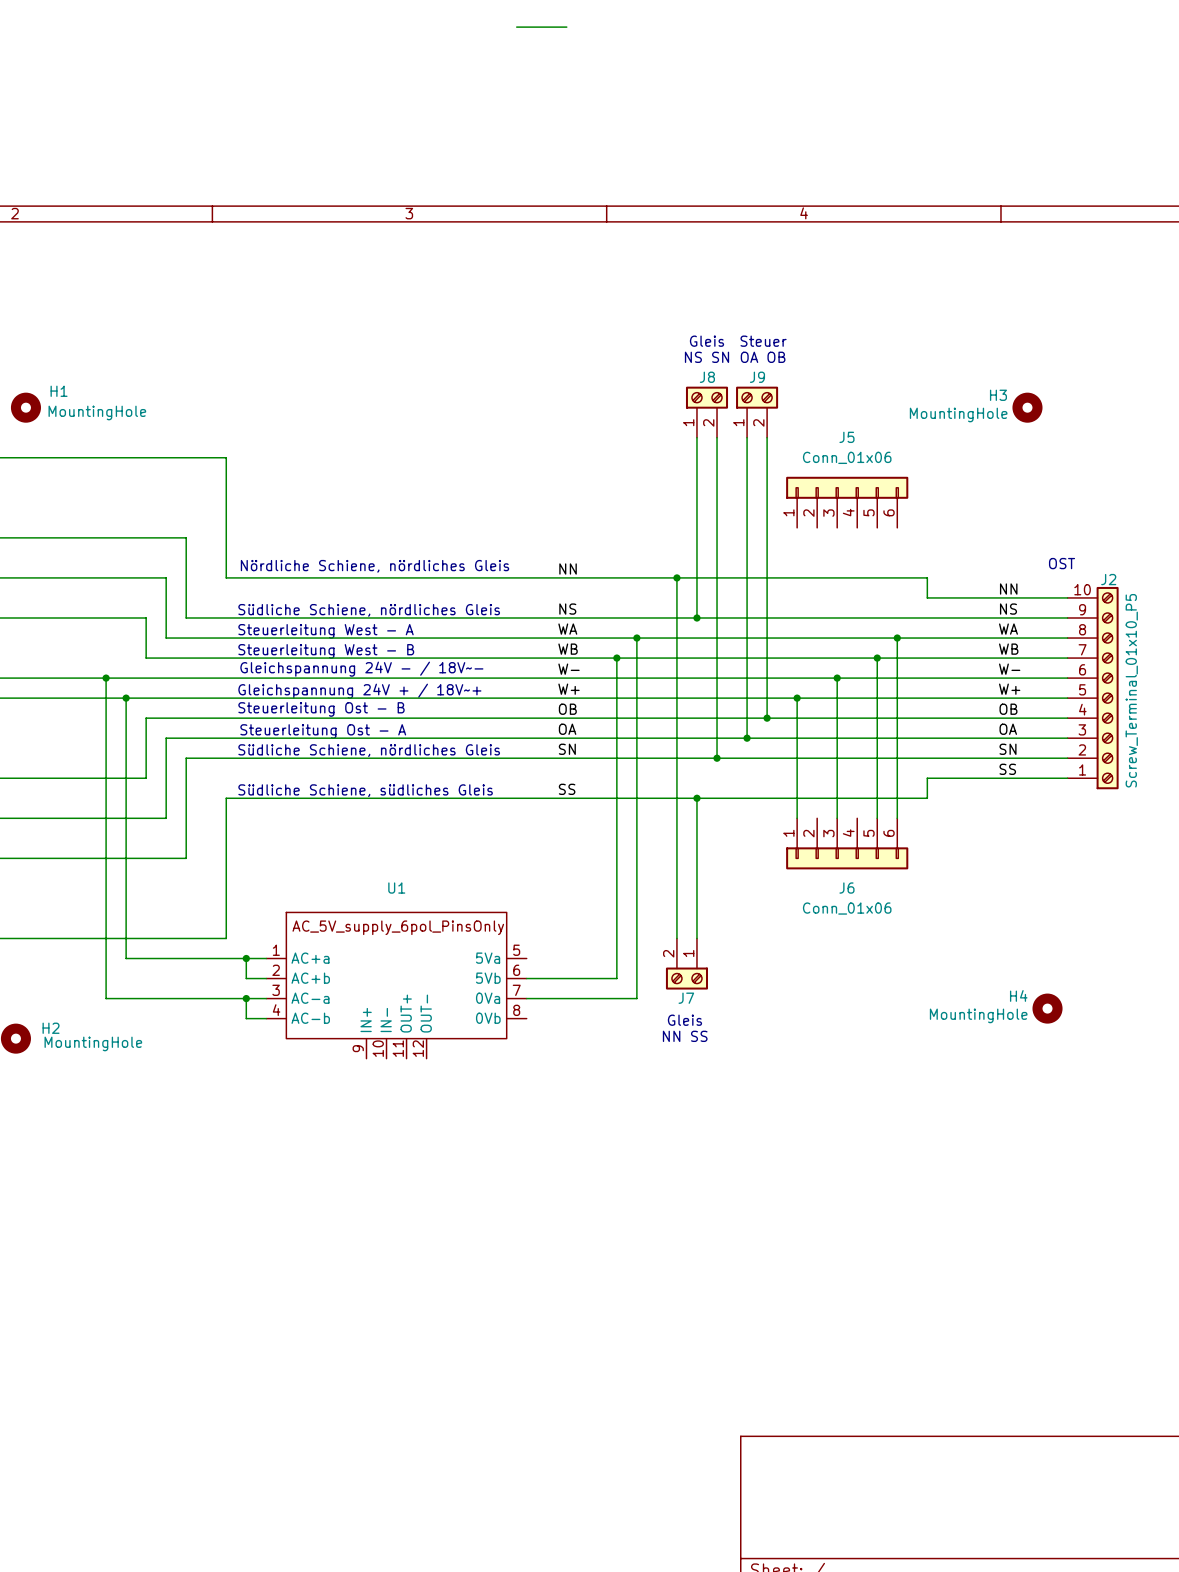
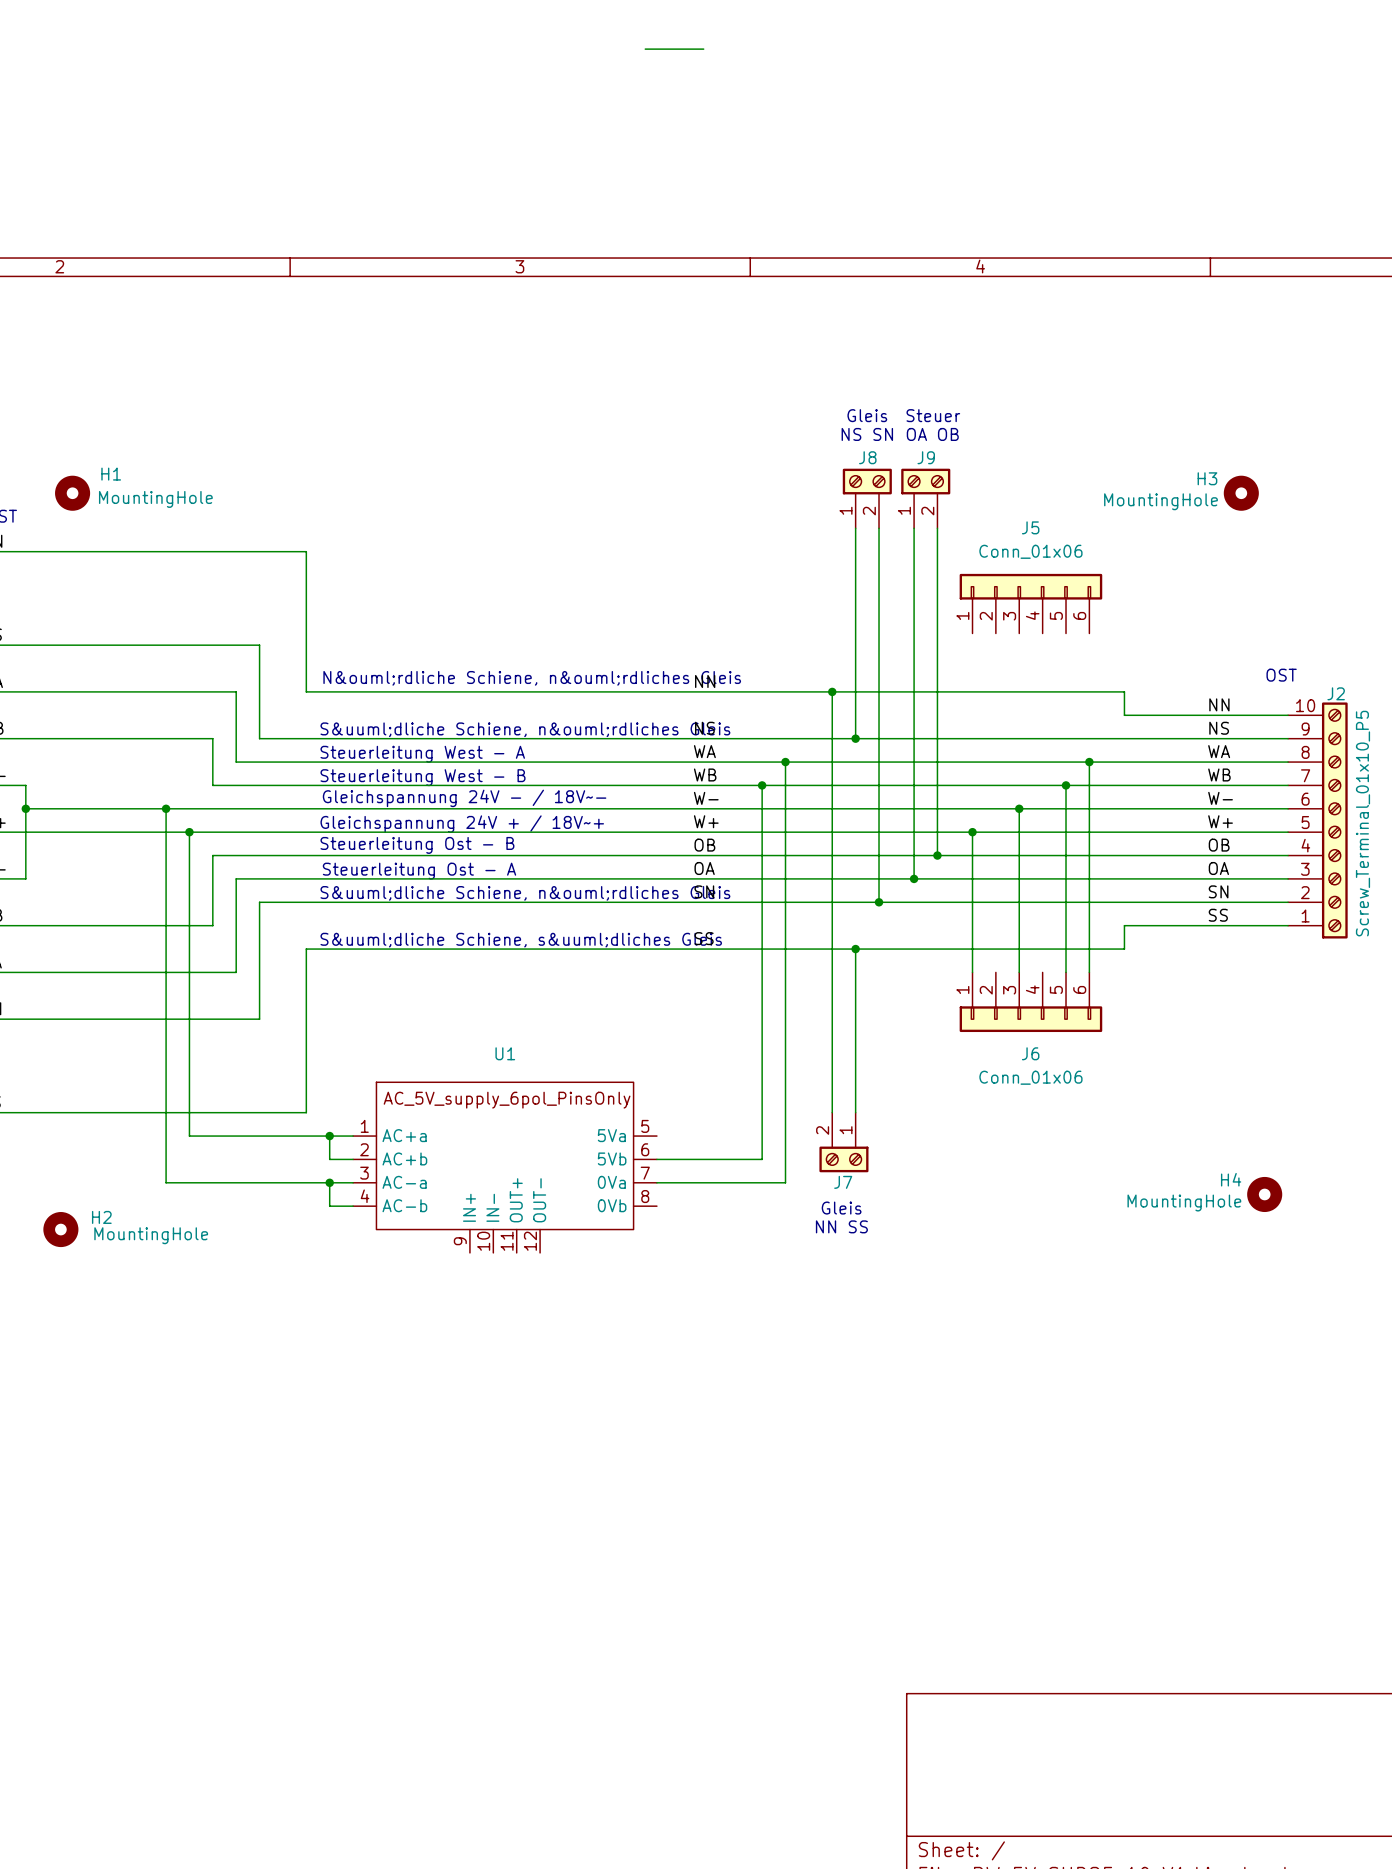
text: Nördliche Schiene, nördliches Gleis (375, 566) -> N&ouml;rdliche Schiene, n&ouml;rdliches Gleis (532, 678)
text: Südliche Schiene, nördliches Gleis (369, 610) -> S&uuml;dliche Schiene, n&ouml;rdliches Gleis (525, 729)
text: Südliche Schiene, nördliches Gleis (369, 750) -> S&uuml;dliche Schiene, n&ouml;rdliches Gleis (525, 893)
text: Südliche Schiene, südliches Gleis (365, 790) -> S&uuml;dliche Schiene, s&uuml;dliches Gleis (521, 940)

